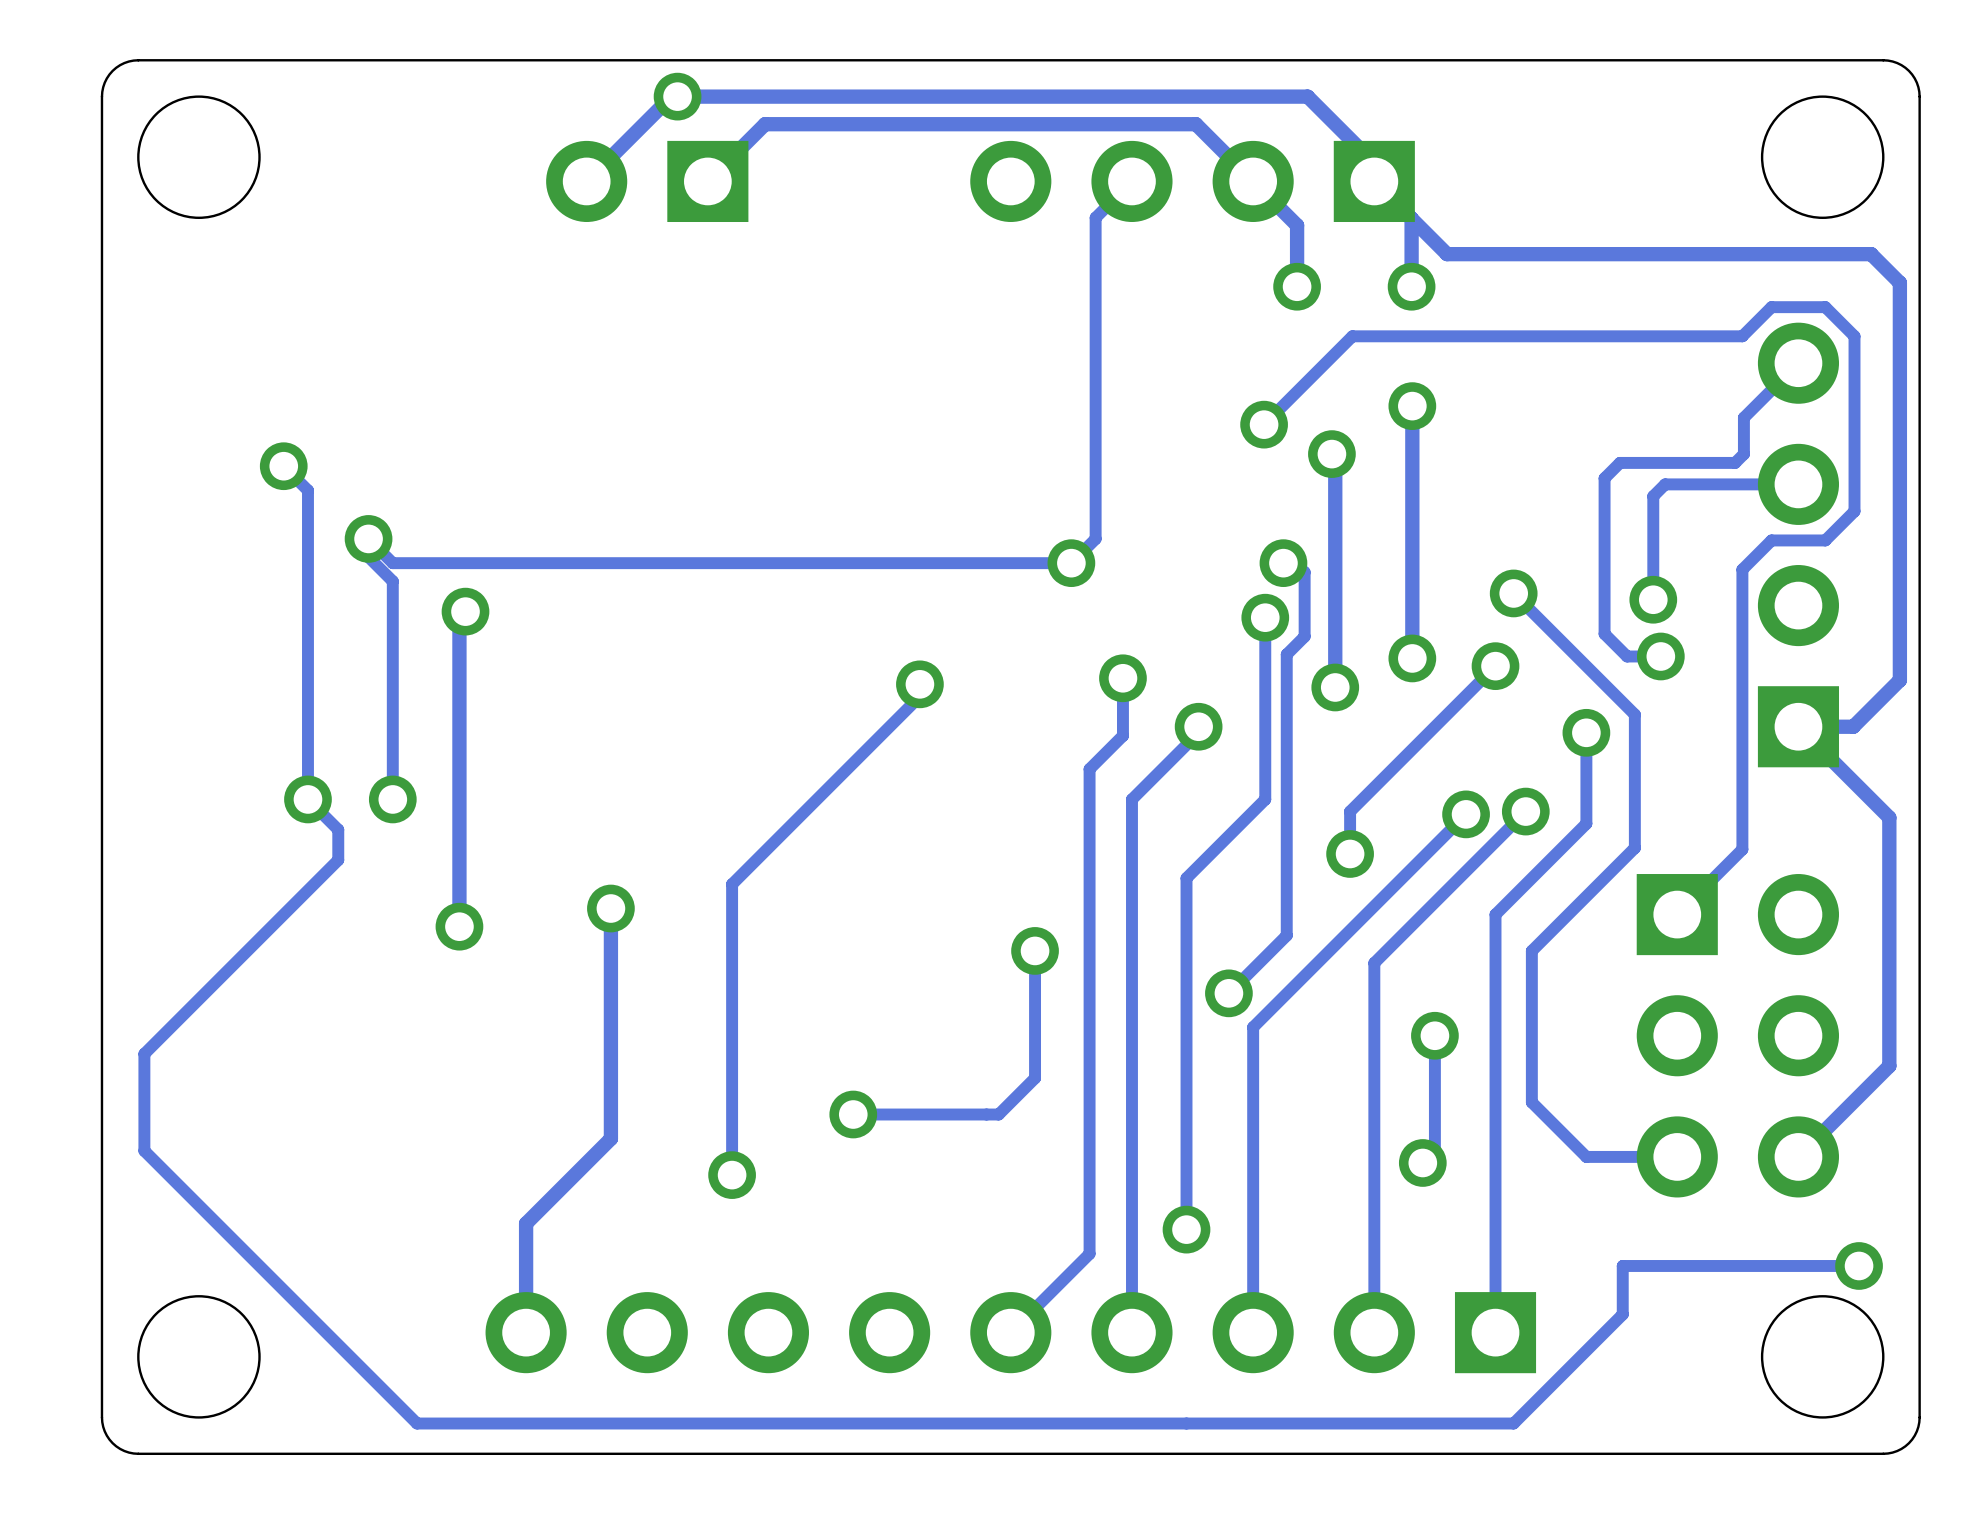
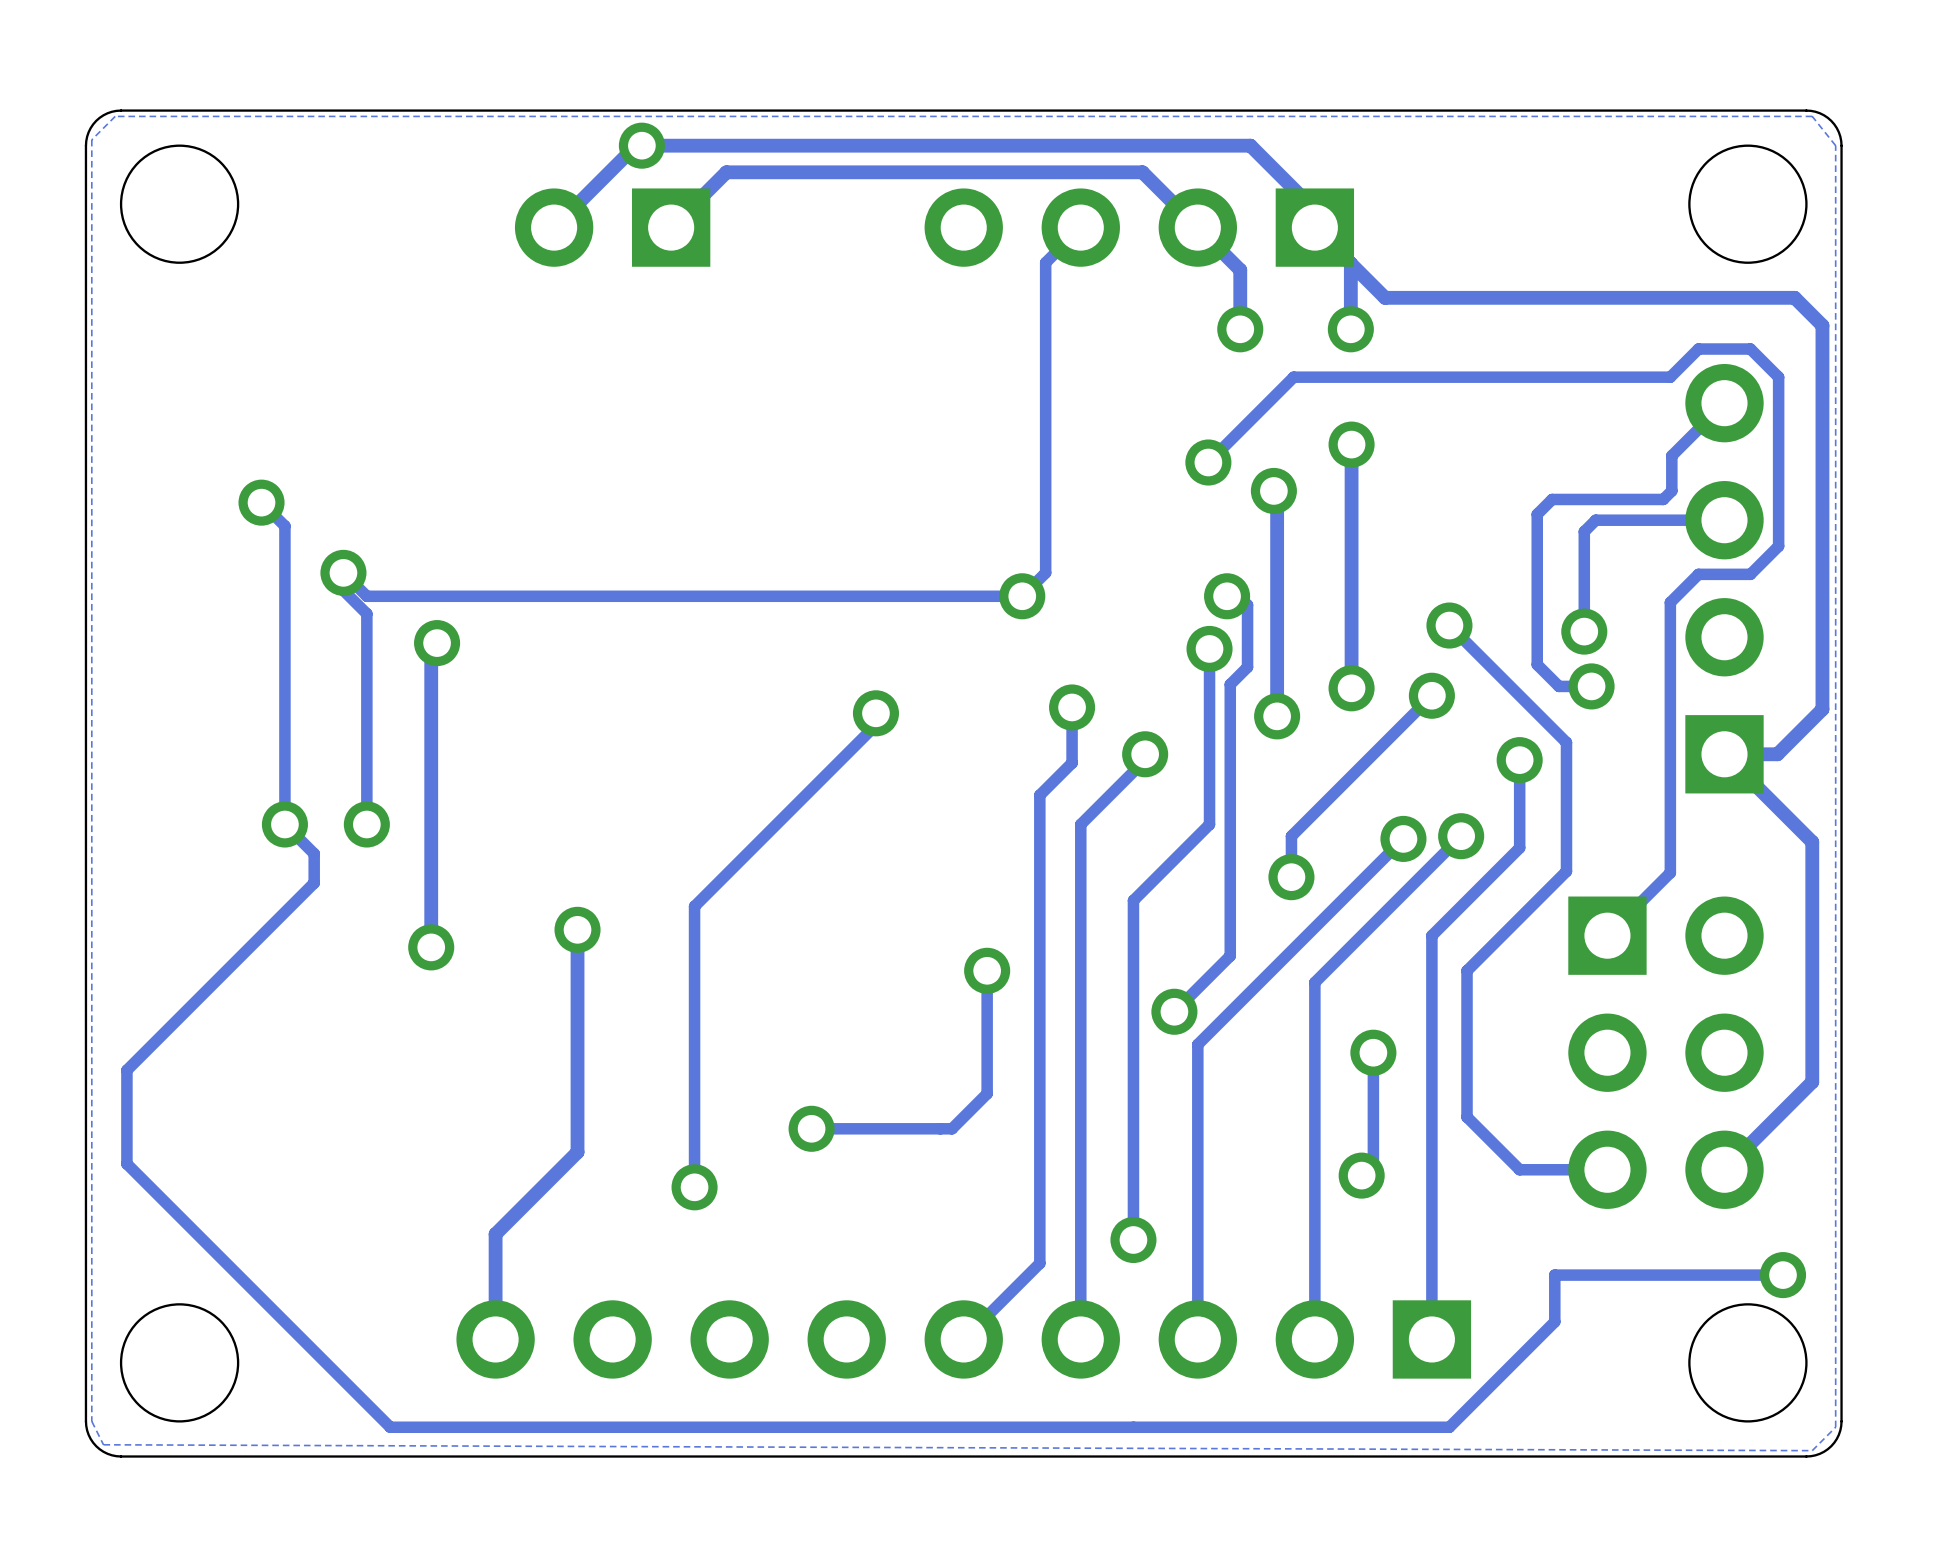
zone outline: none -> (1812, 116) (1835, 145) (1835, 1427) (1812, 1450) (103, 1444) (91, 1421) (91, 139) (115, 116) (1812, 116)

